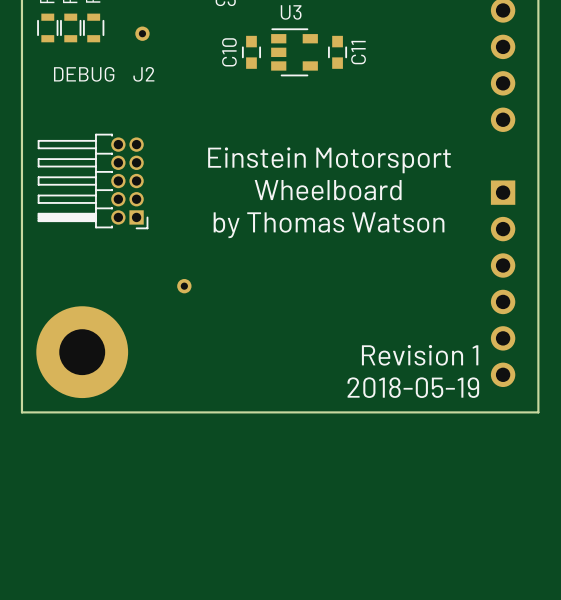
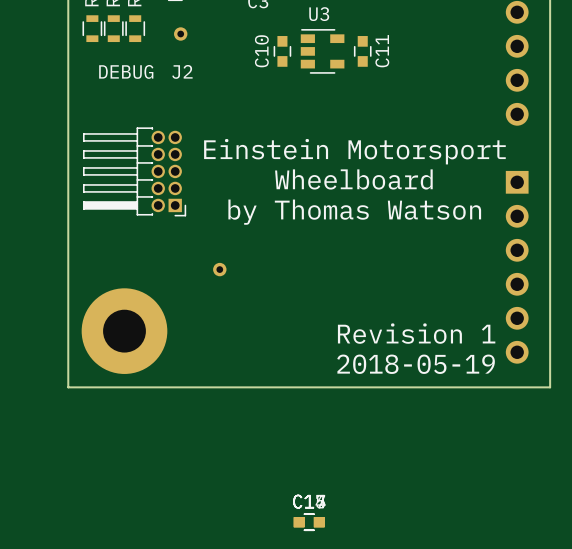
part: none -> (309, 522)
part: none -> (309, 522)
part: none -> (309, 522)

